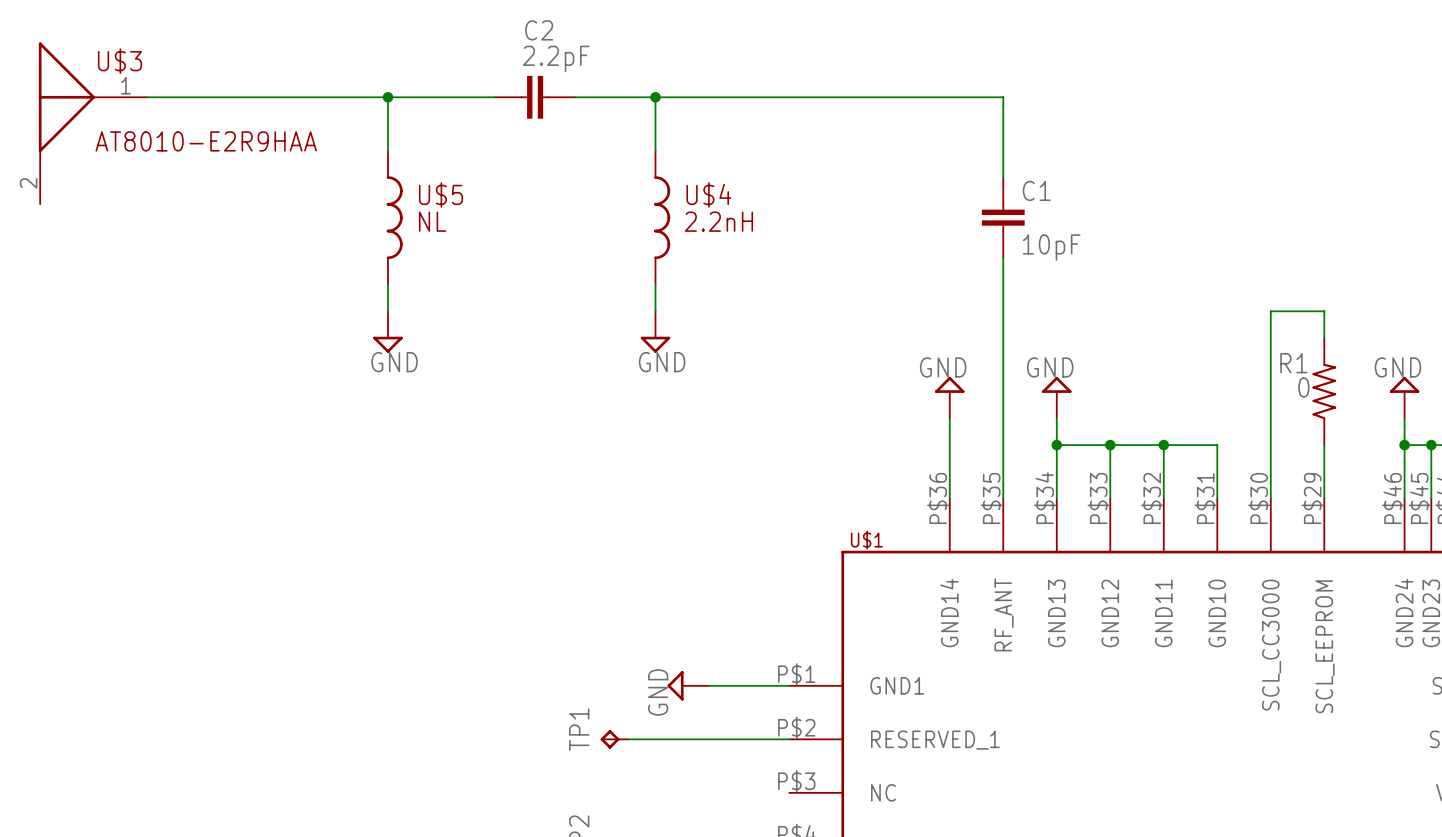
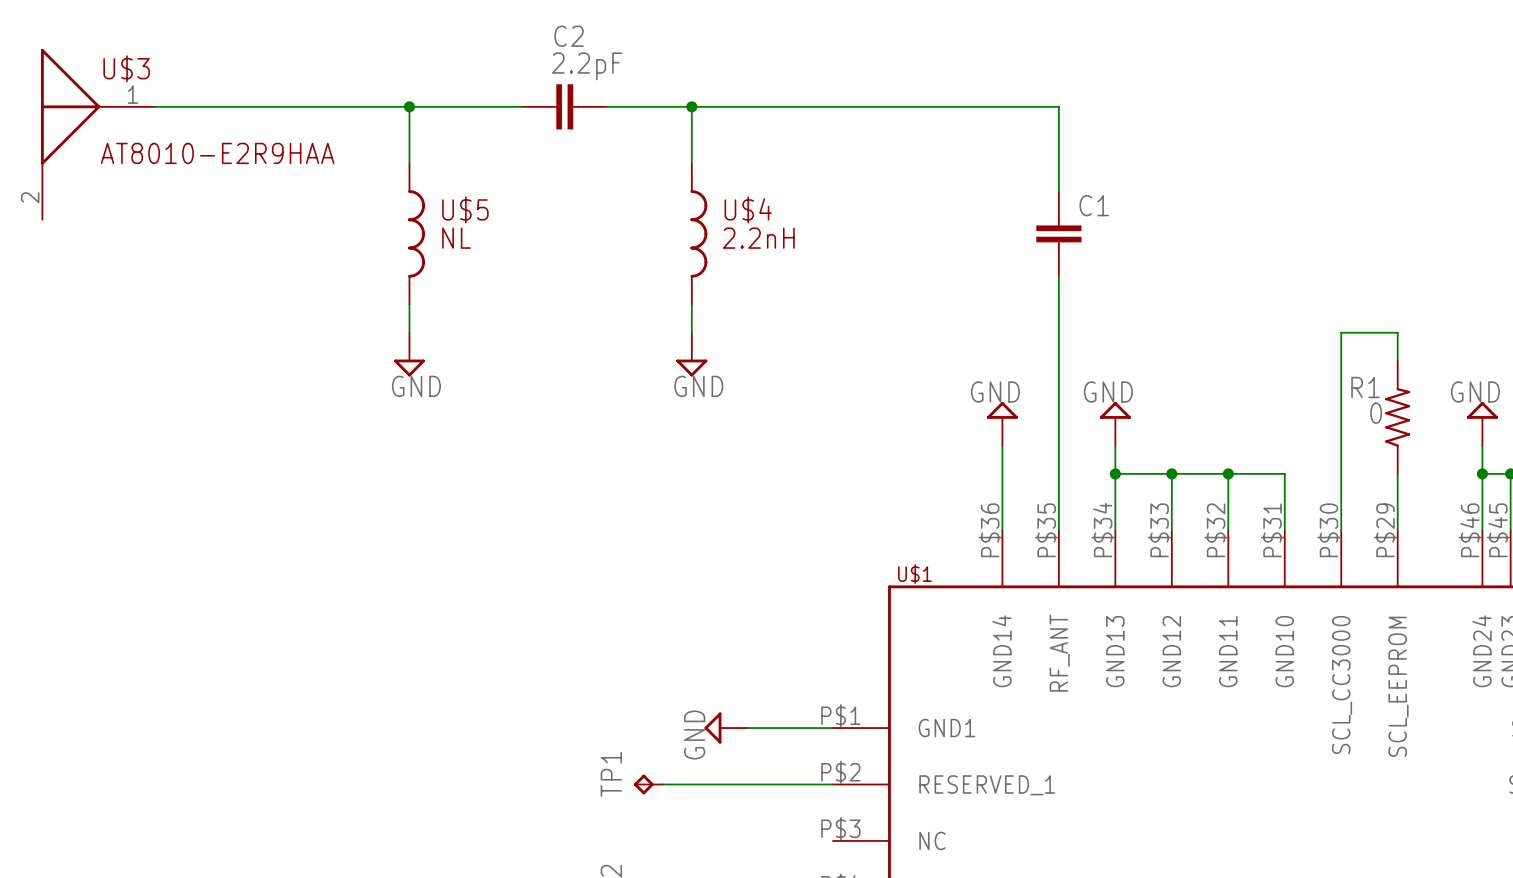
C1 value: 10pF (1051, 247) -> none

